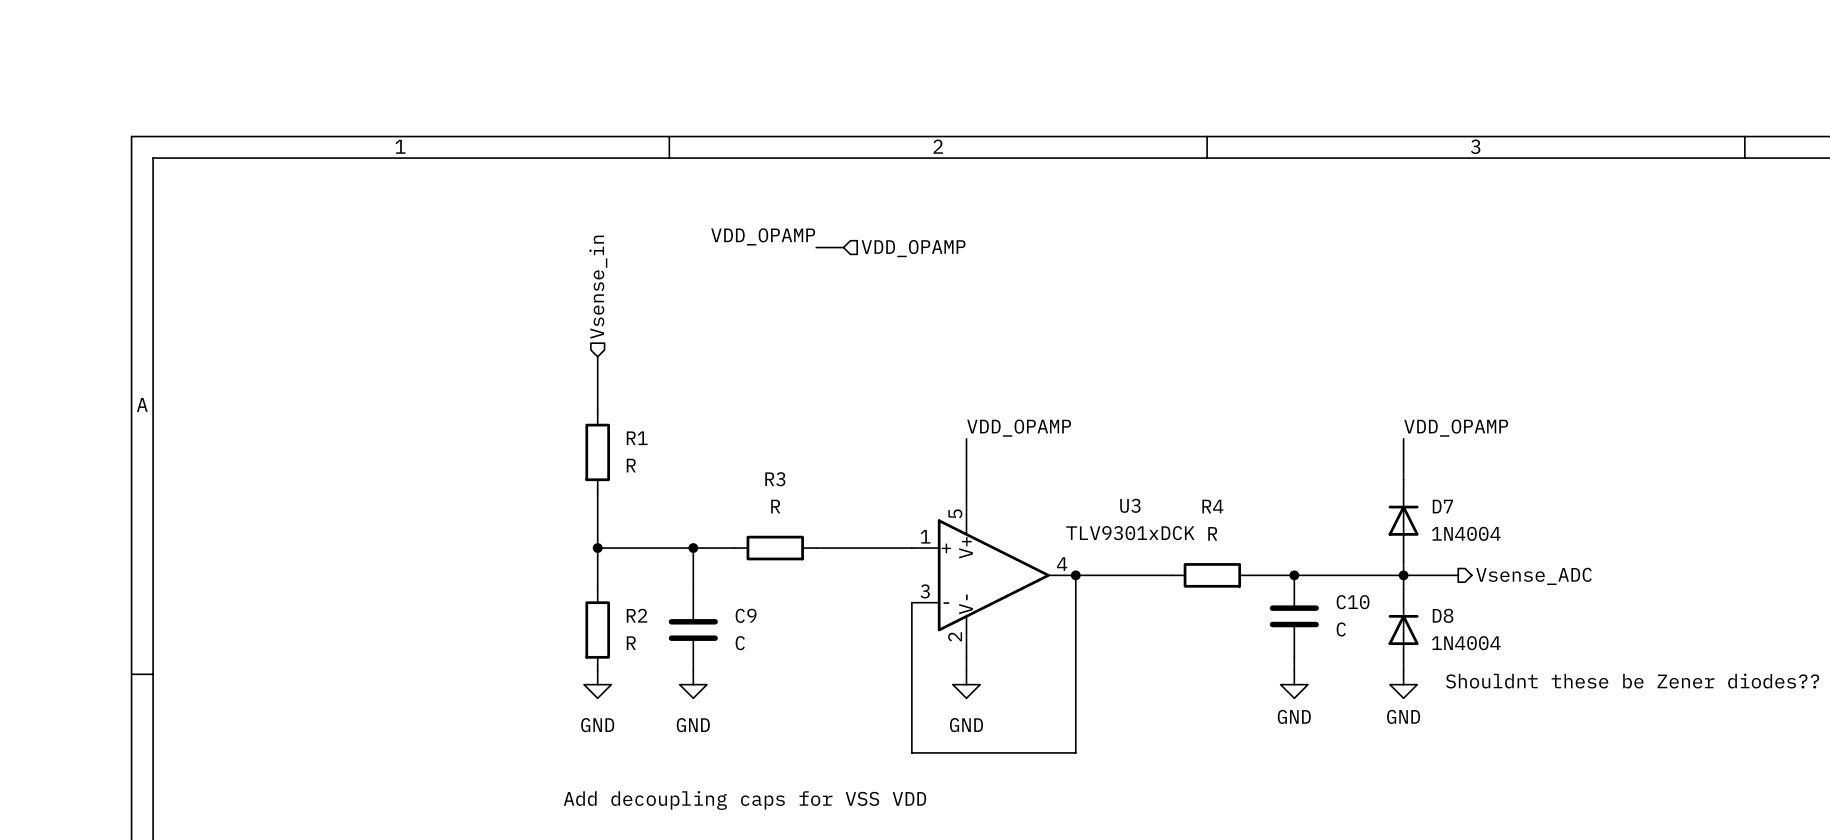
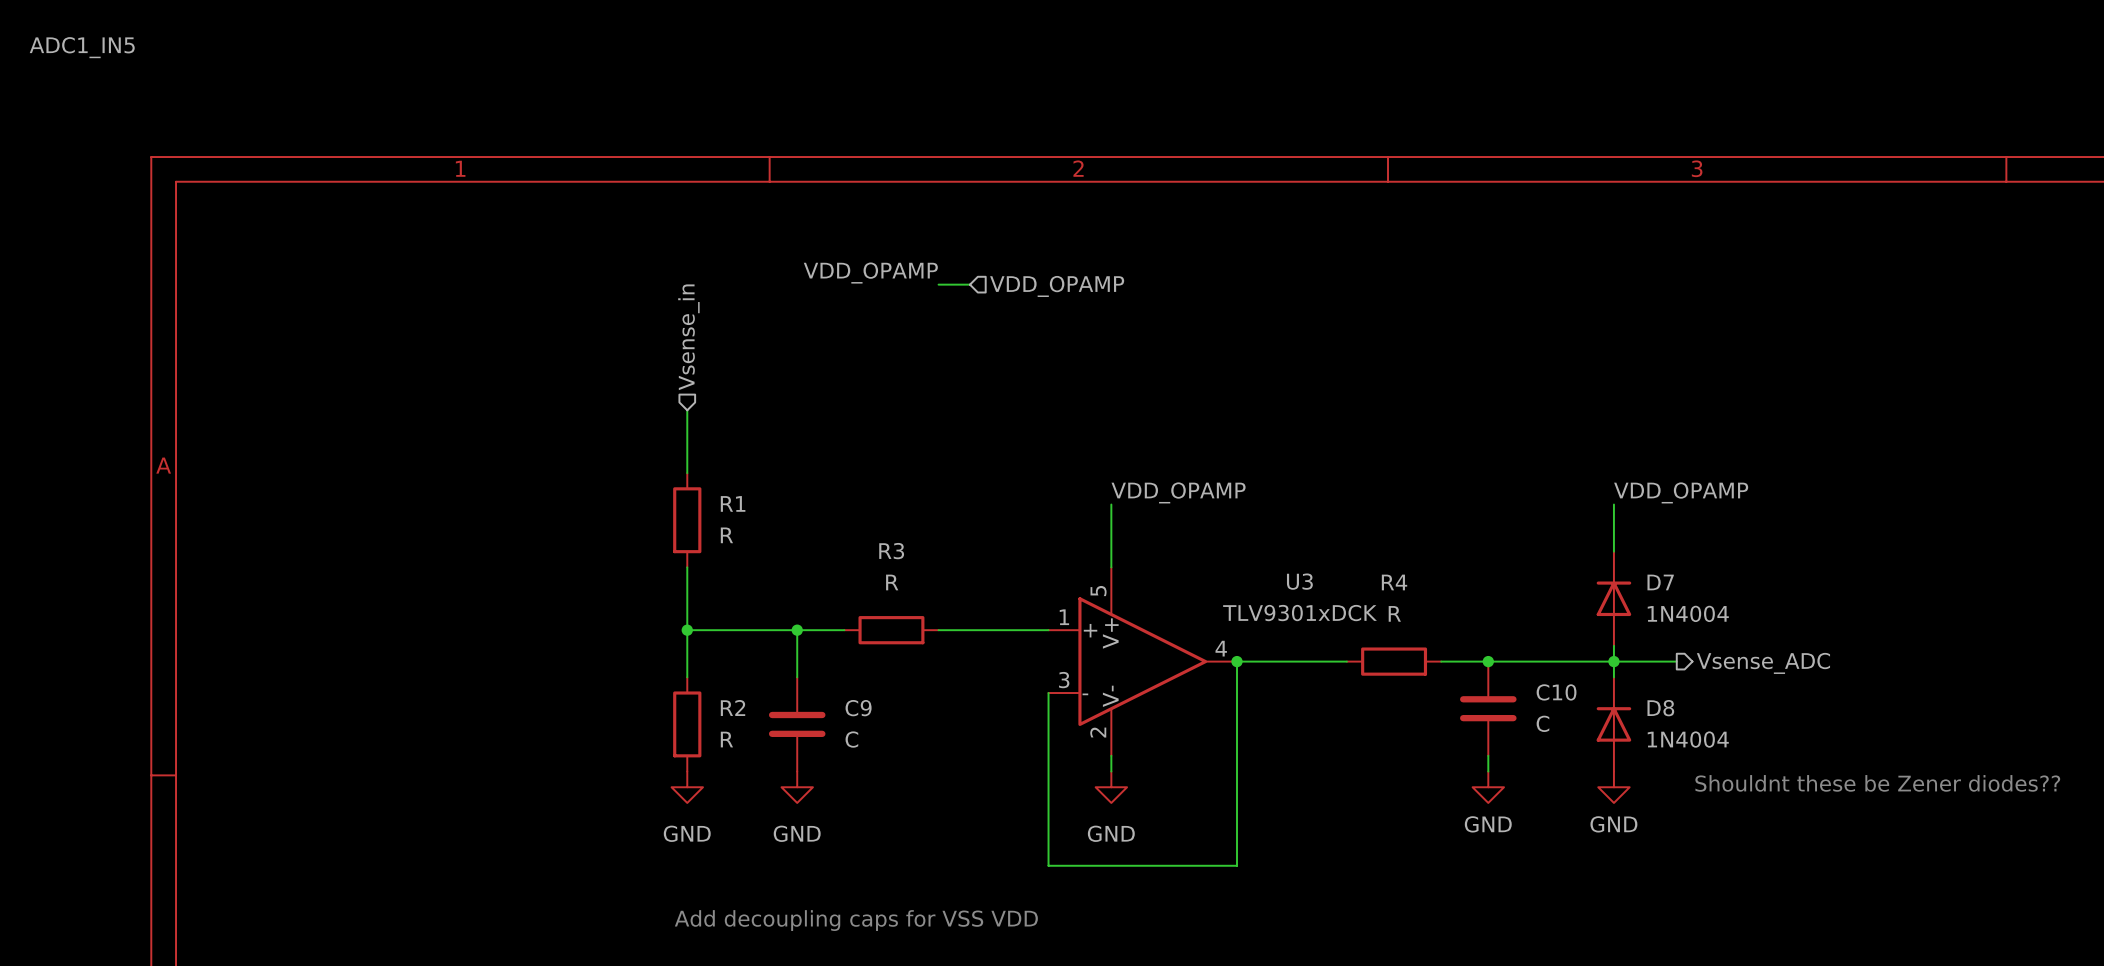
label: none -> ADC1_IN5 (82, 47)

